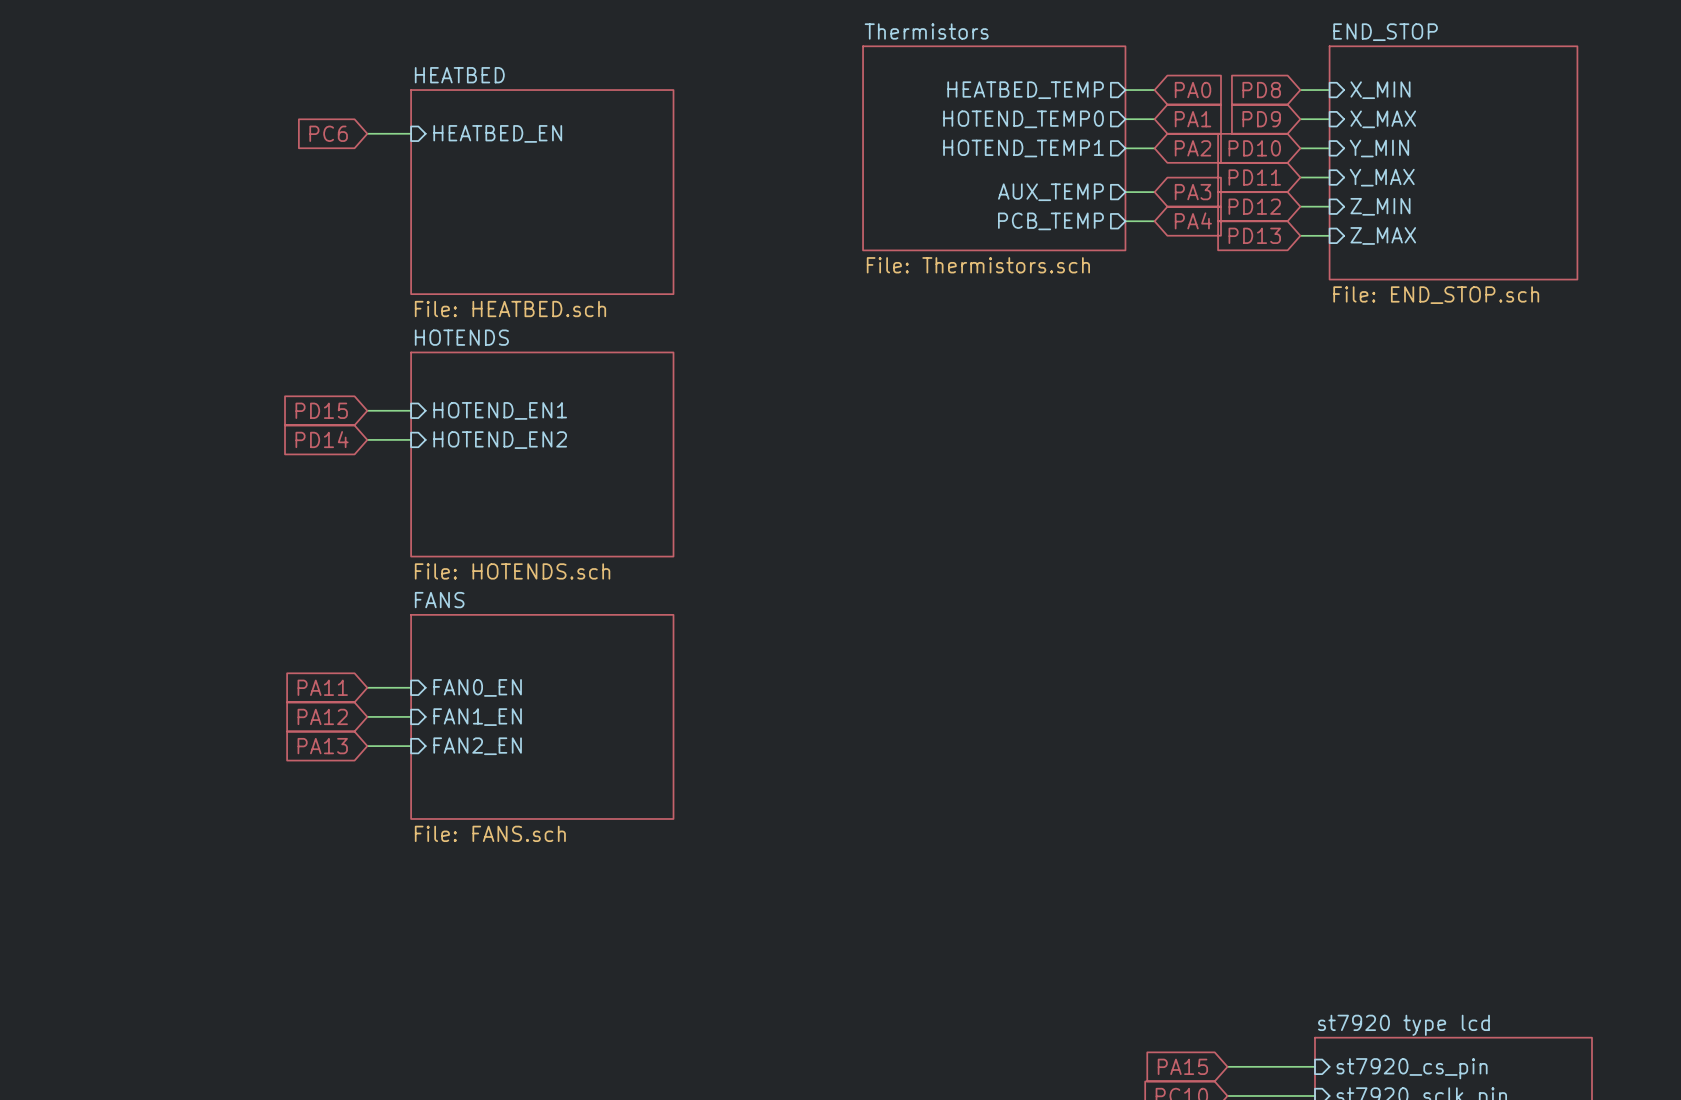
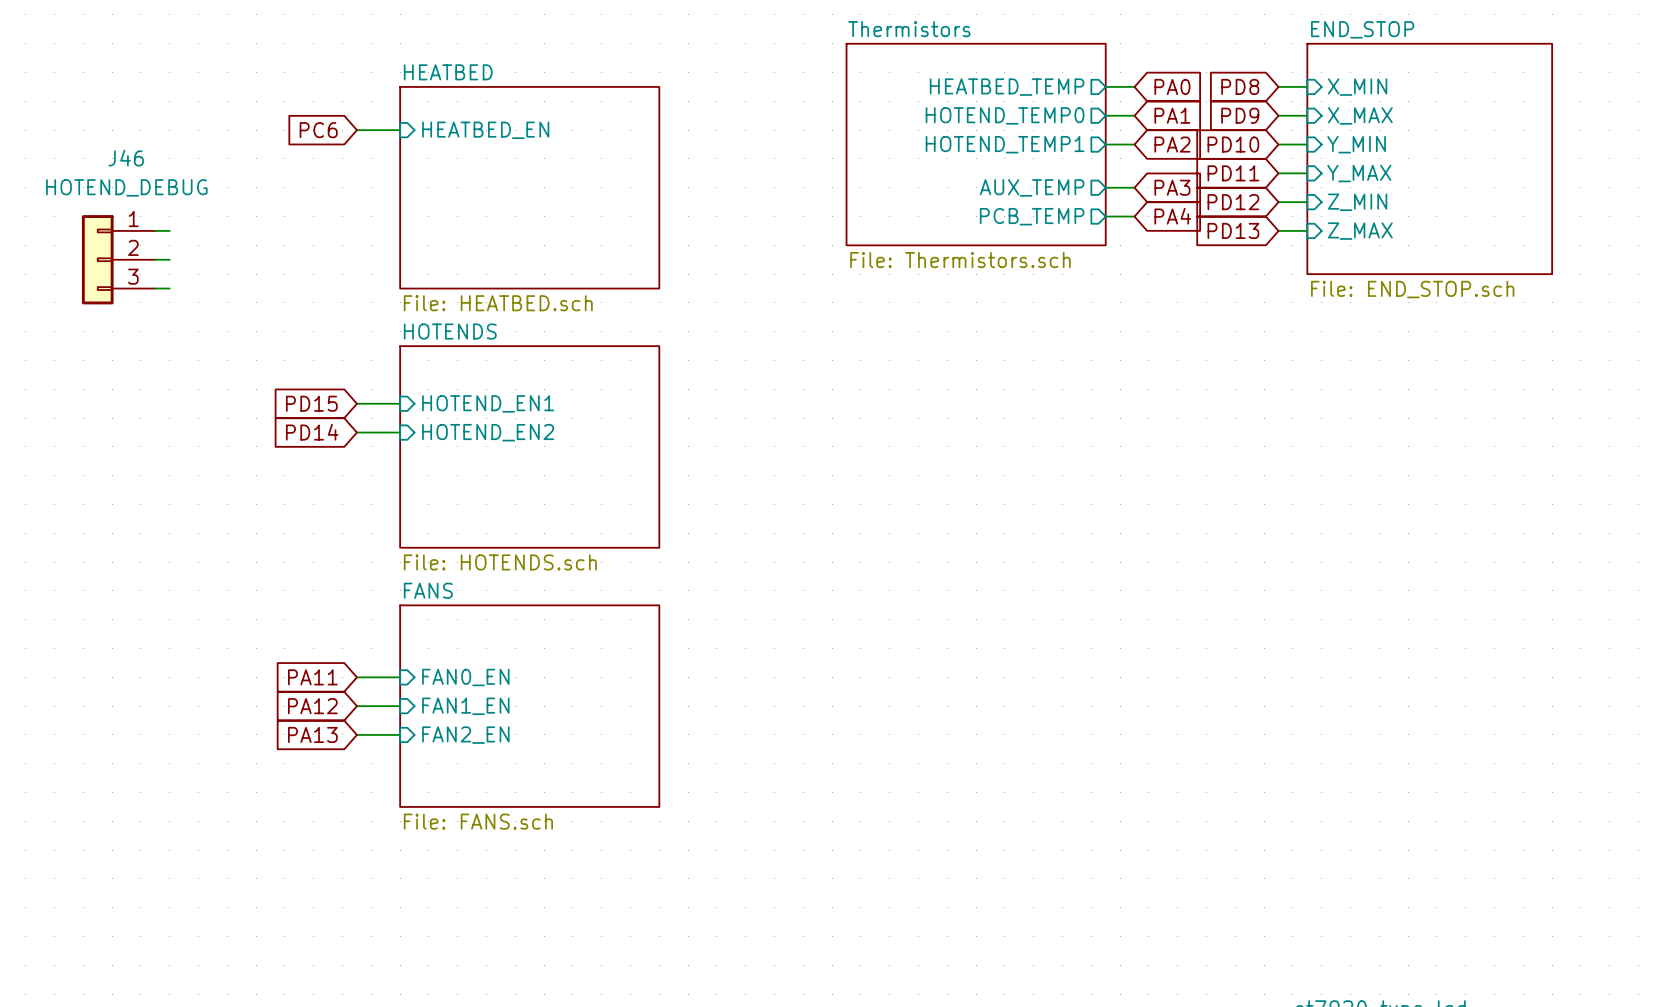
wire: none -> (155, 230) (169, 230)
J46: none -> HOTEND_DEBUG (118, 259)
wire: none -> (155, 259) (169, 259)
wire: none -> (155, 288) (169, 288)

